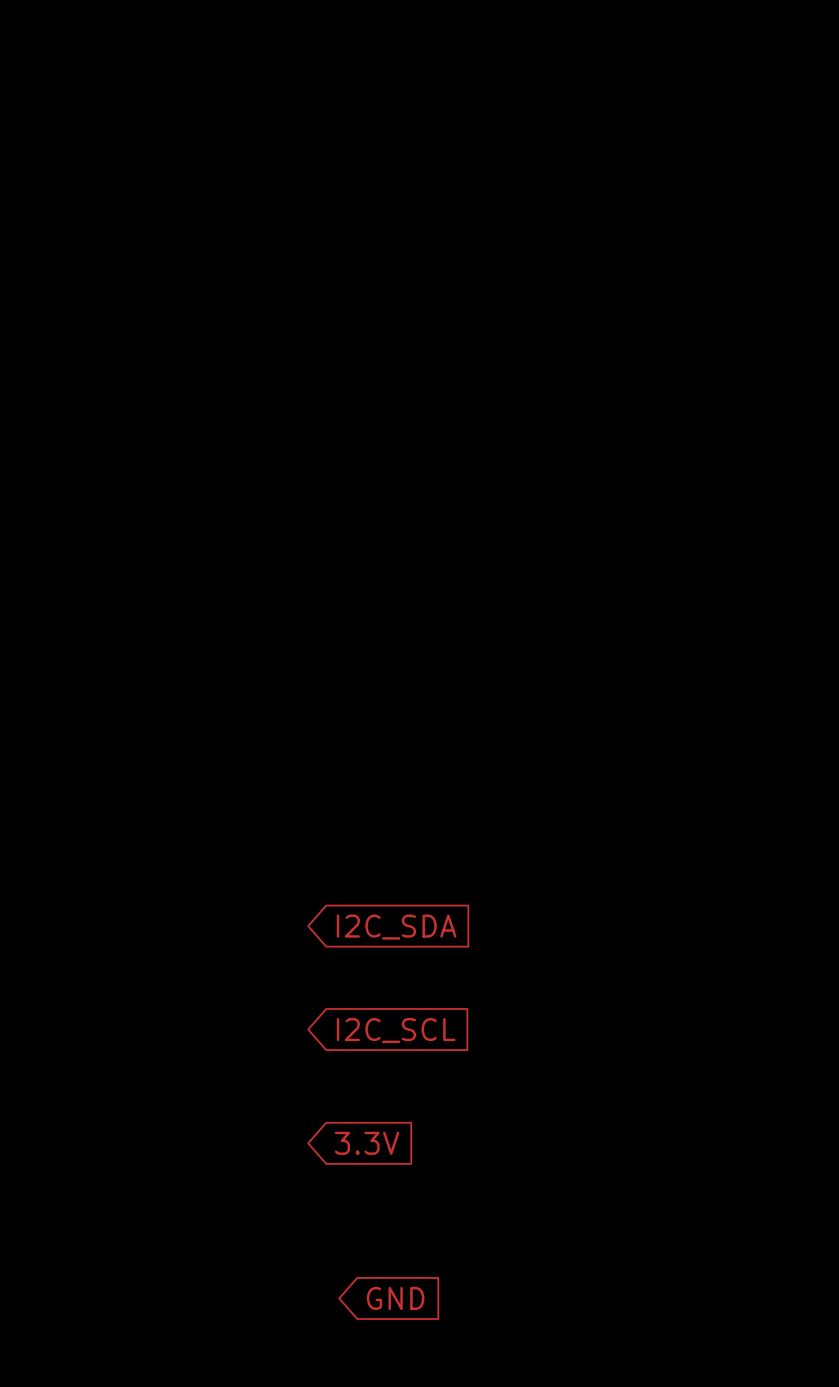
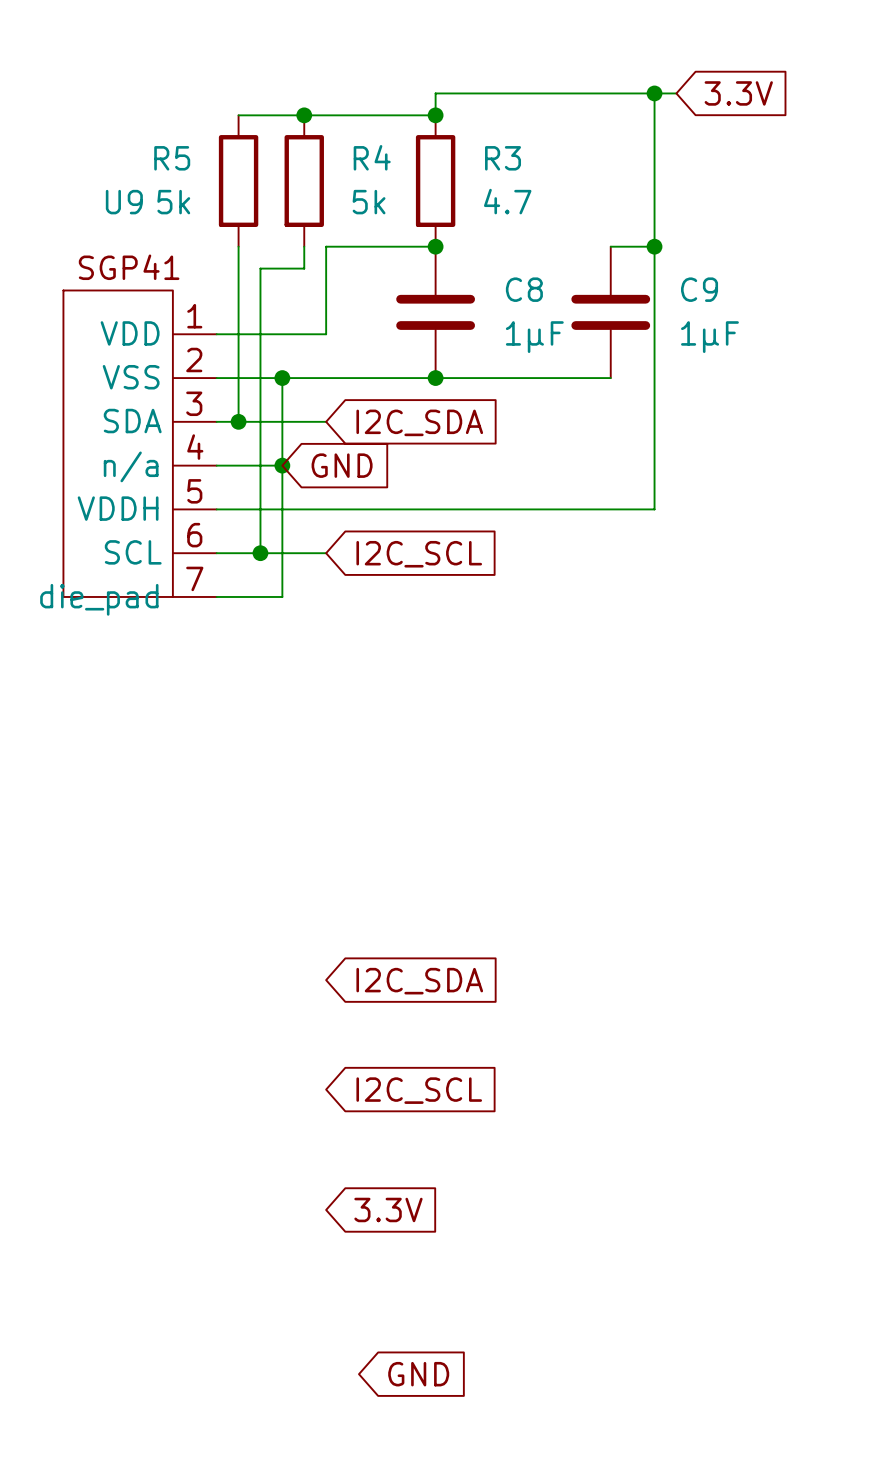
wire: none -> (654, 93) (654, 509) (216, 509)
junction: none -> (654, 93)
wire: none -> (676, 93) (435, 93) (435, 115) (238, 115)
global label: none -> 3.3V (738, 93)
junction: none -> (304, 115)
junction: none -> (435, 115)
R5: none -> 5k (238, 181)
R4: none -> 5k (304, 181)
R3: none -> 4.7 (435, 181)
wire: none -> (238, 246) (238, 421)
wire: none -> (304, 246) (304, 268) (260, 268) (260, 553)
wire: none -> (435, 246) (326, 246) (326, 334) (216, 334)
junction: none -> (435, 246)
wire: none -> (610, 246) (654, 246)
junction: none -> (654, 246)
C8: none -> 1µF (435, 312)
C9: none -> 1µF (610, 312)
wire: none -> (216, 378) (610, 378)
wire: none -> (282, 378) (282, 596) (216, 596)
junction: none -> (282, 378)
junction: none -> (435, 378)
wire: none -> (216, 421) (326, 421)
junction: none -> (238, 421)
global label: none -> I2C_SDA (419, 422)
U9: none -> (140, 443)
wire: none -> (216, 465) (282, 465)
junction: none -> (282, 465)
global label: none -> GND (342, 465)
wire: none -> (216, 553) (326, 553)
junction: none -> (260, 553)
global label: none -> I2C_SCL (419, 554)

